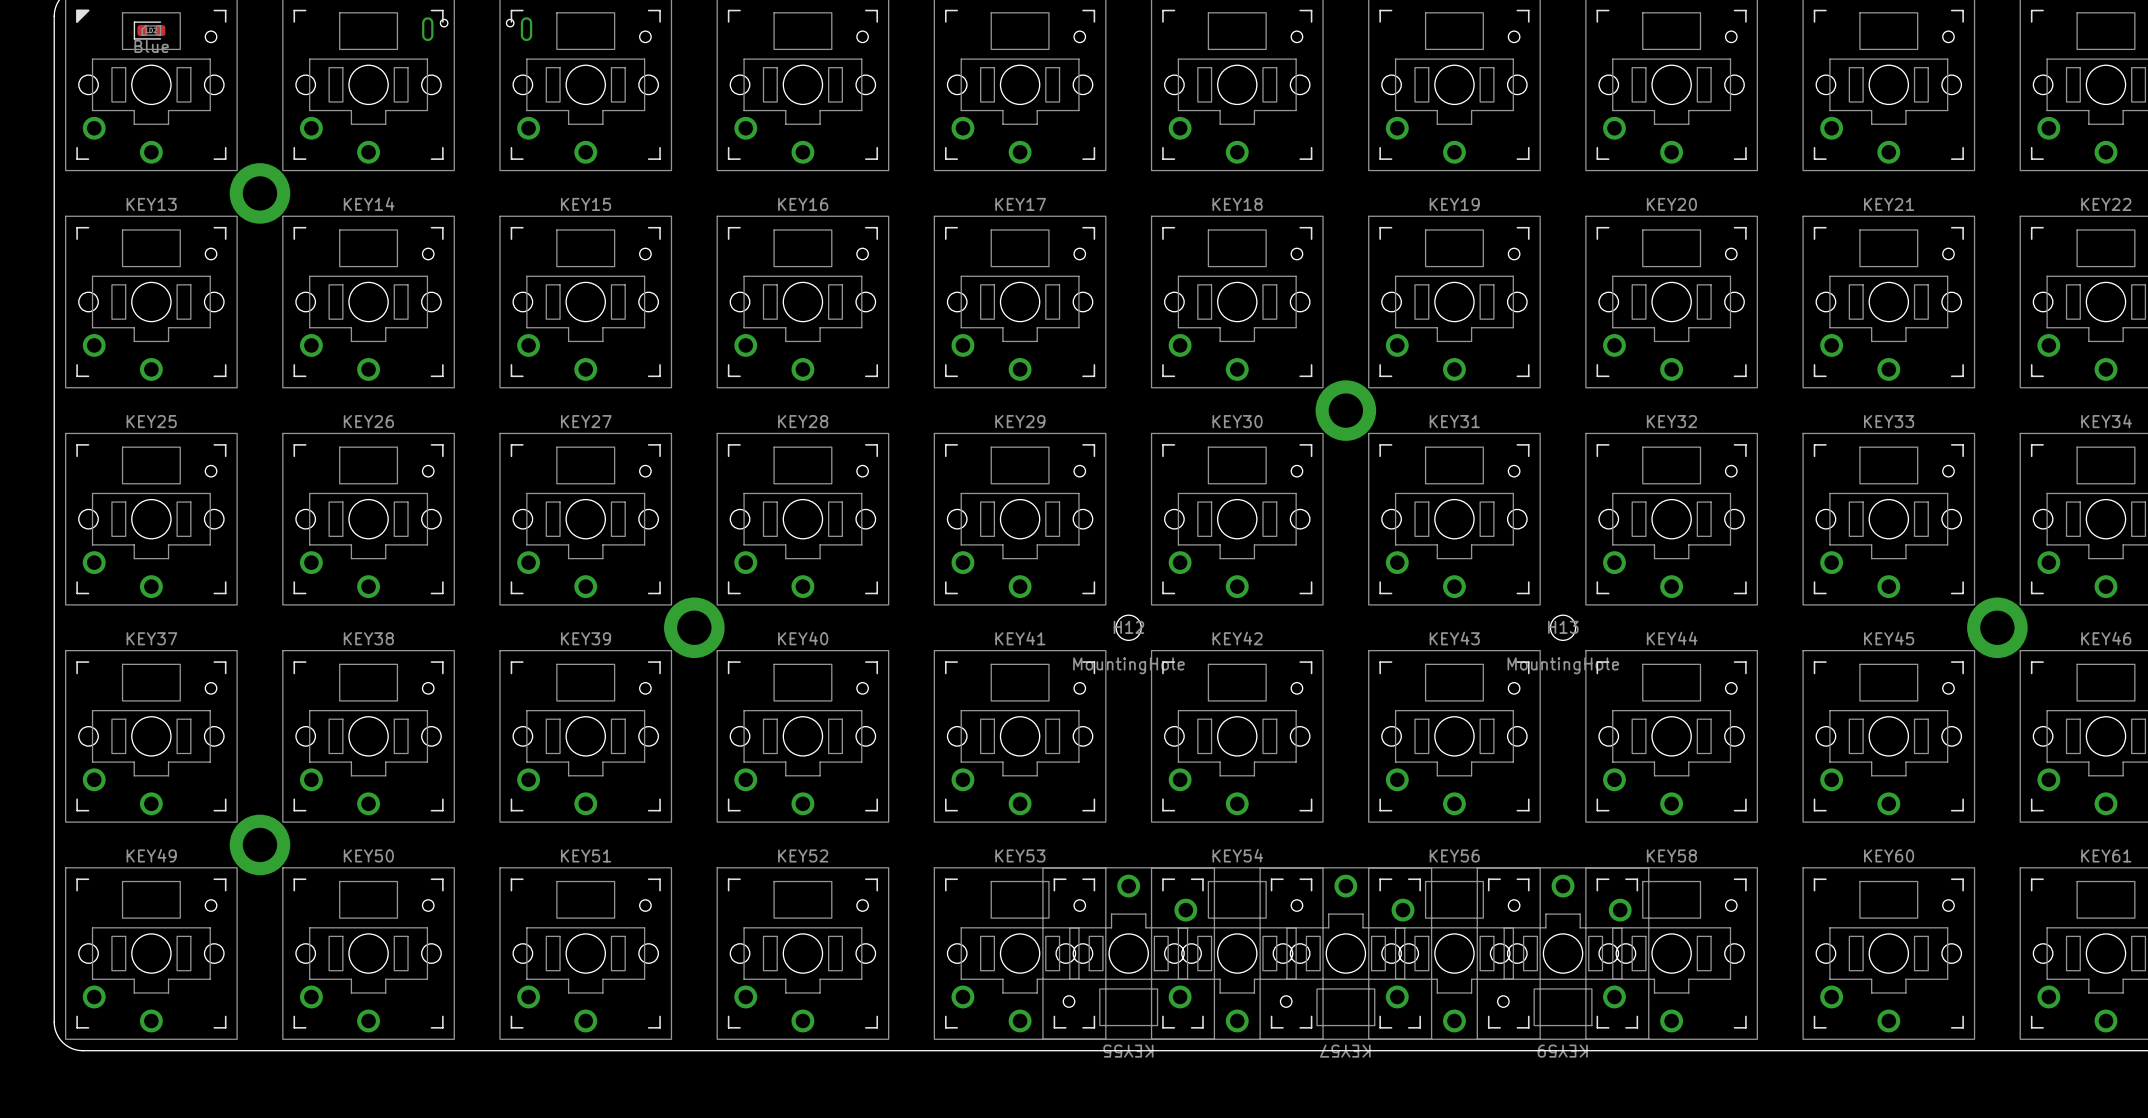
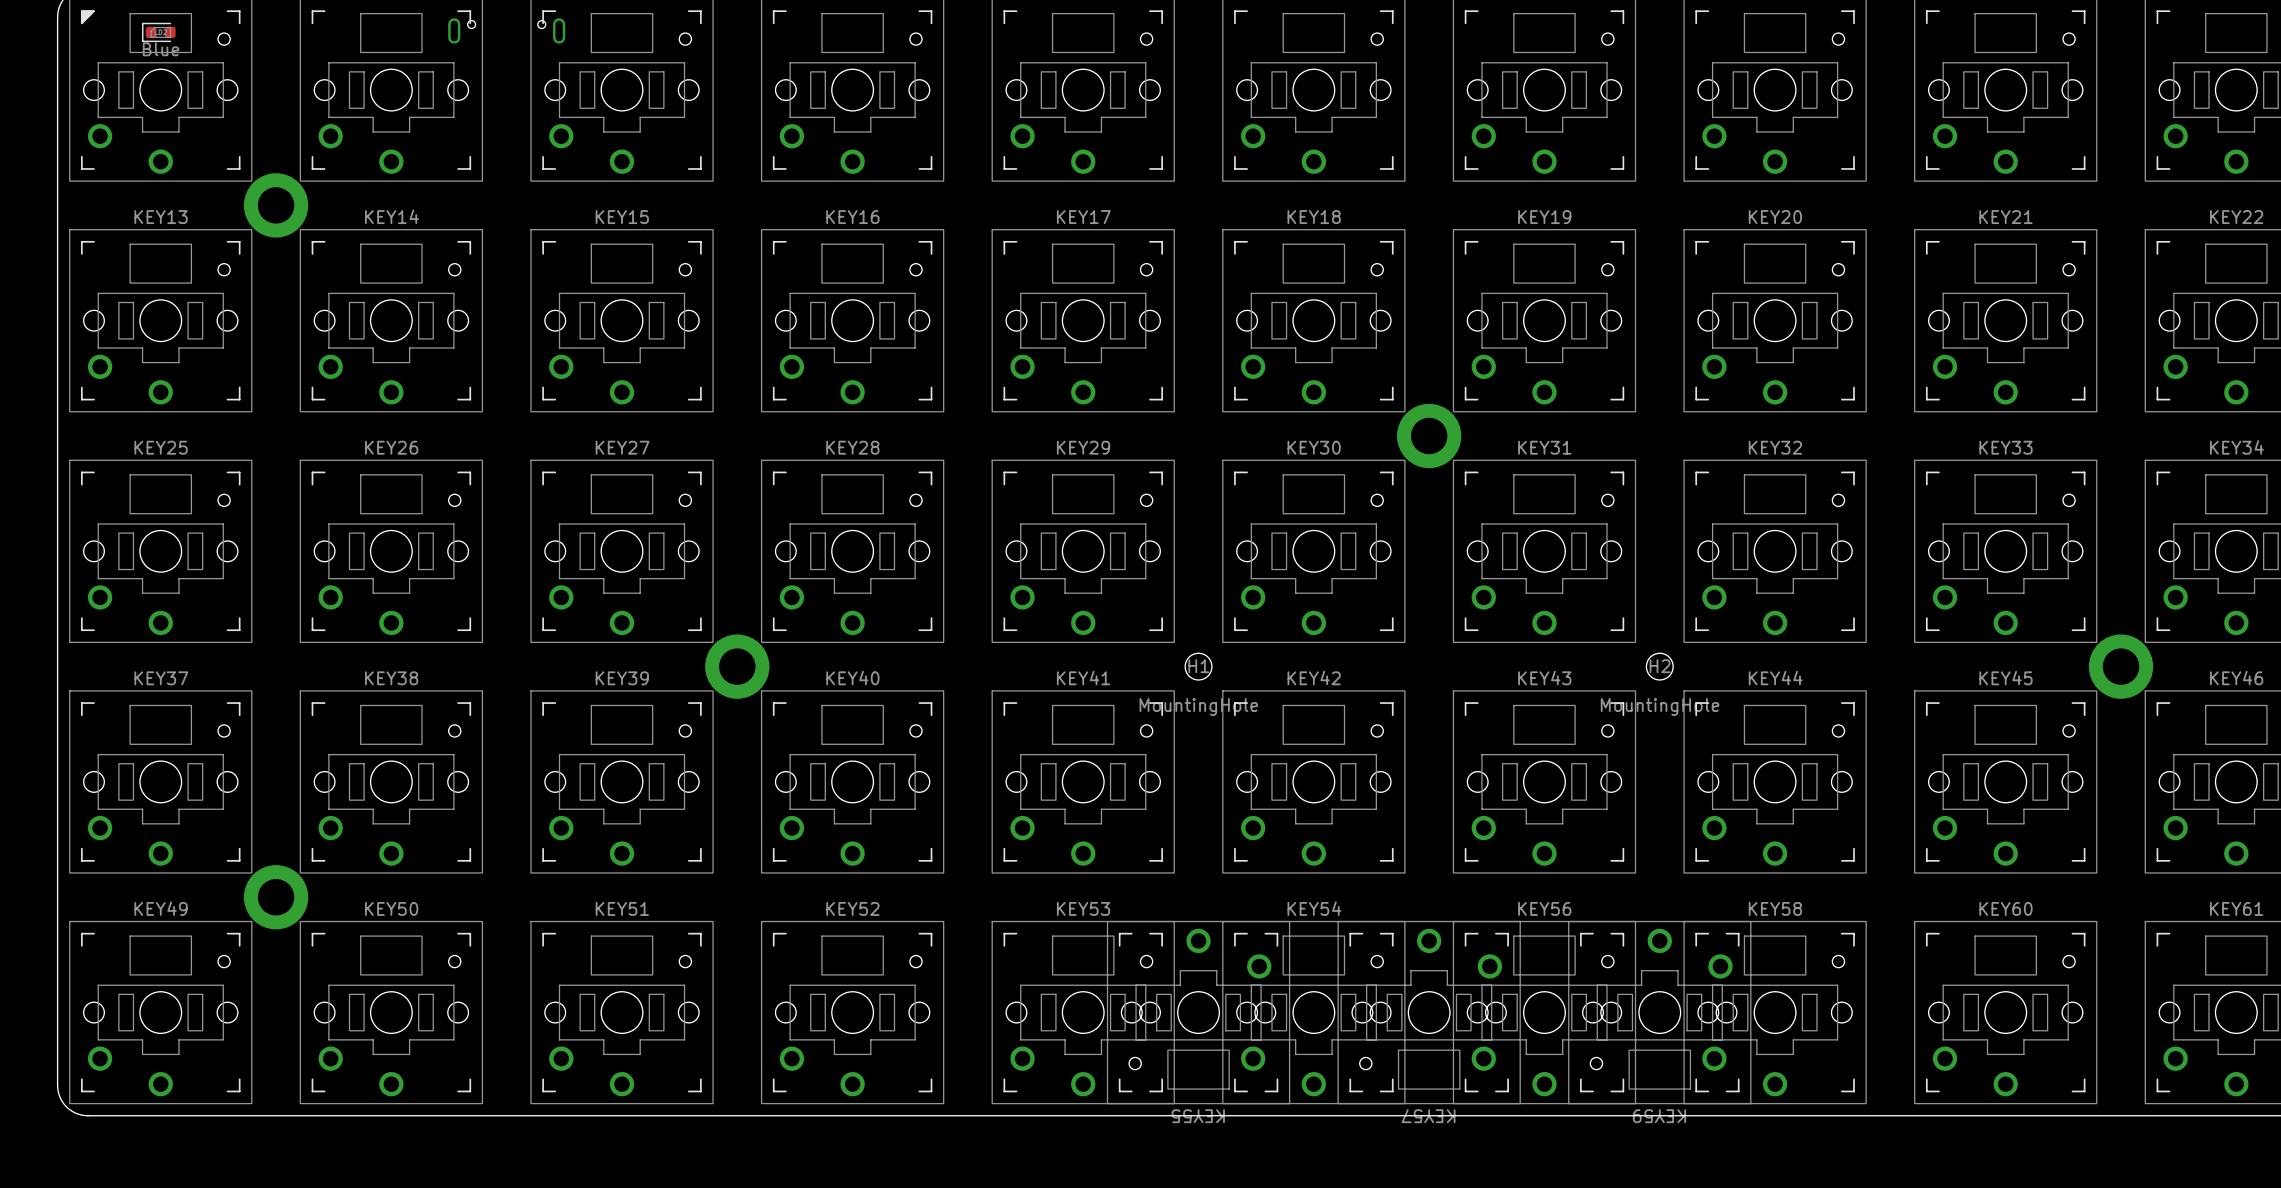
H12 name: H12 (1128, 627) -> H1 (1198, 666)
H13 name: H13 (1563, 627) -> H2 (1660, 666)

